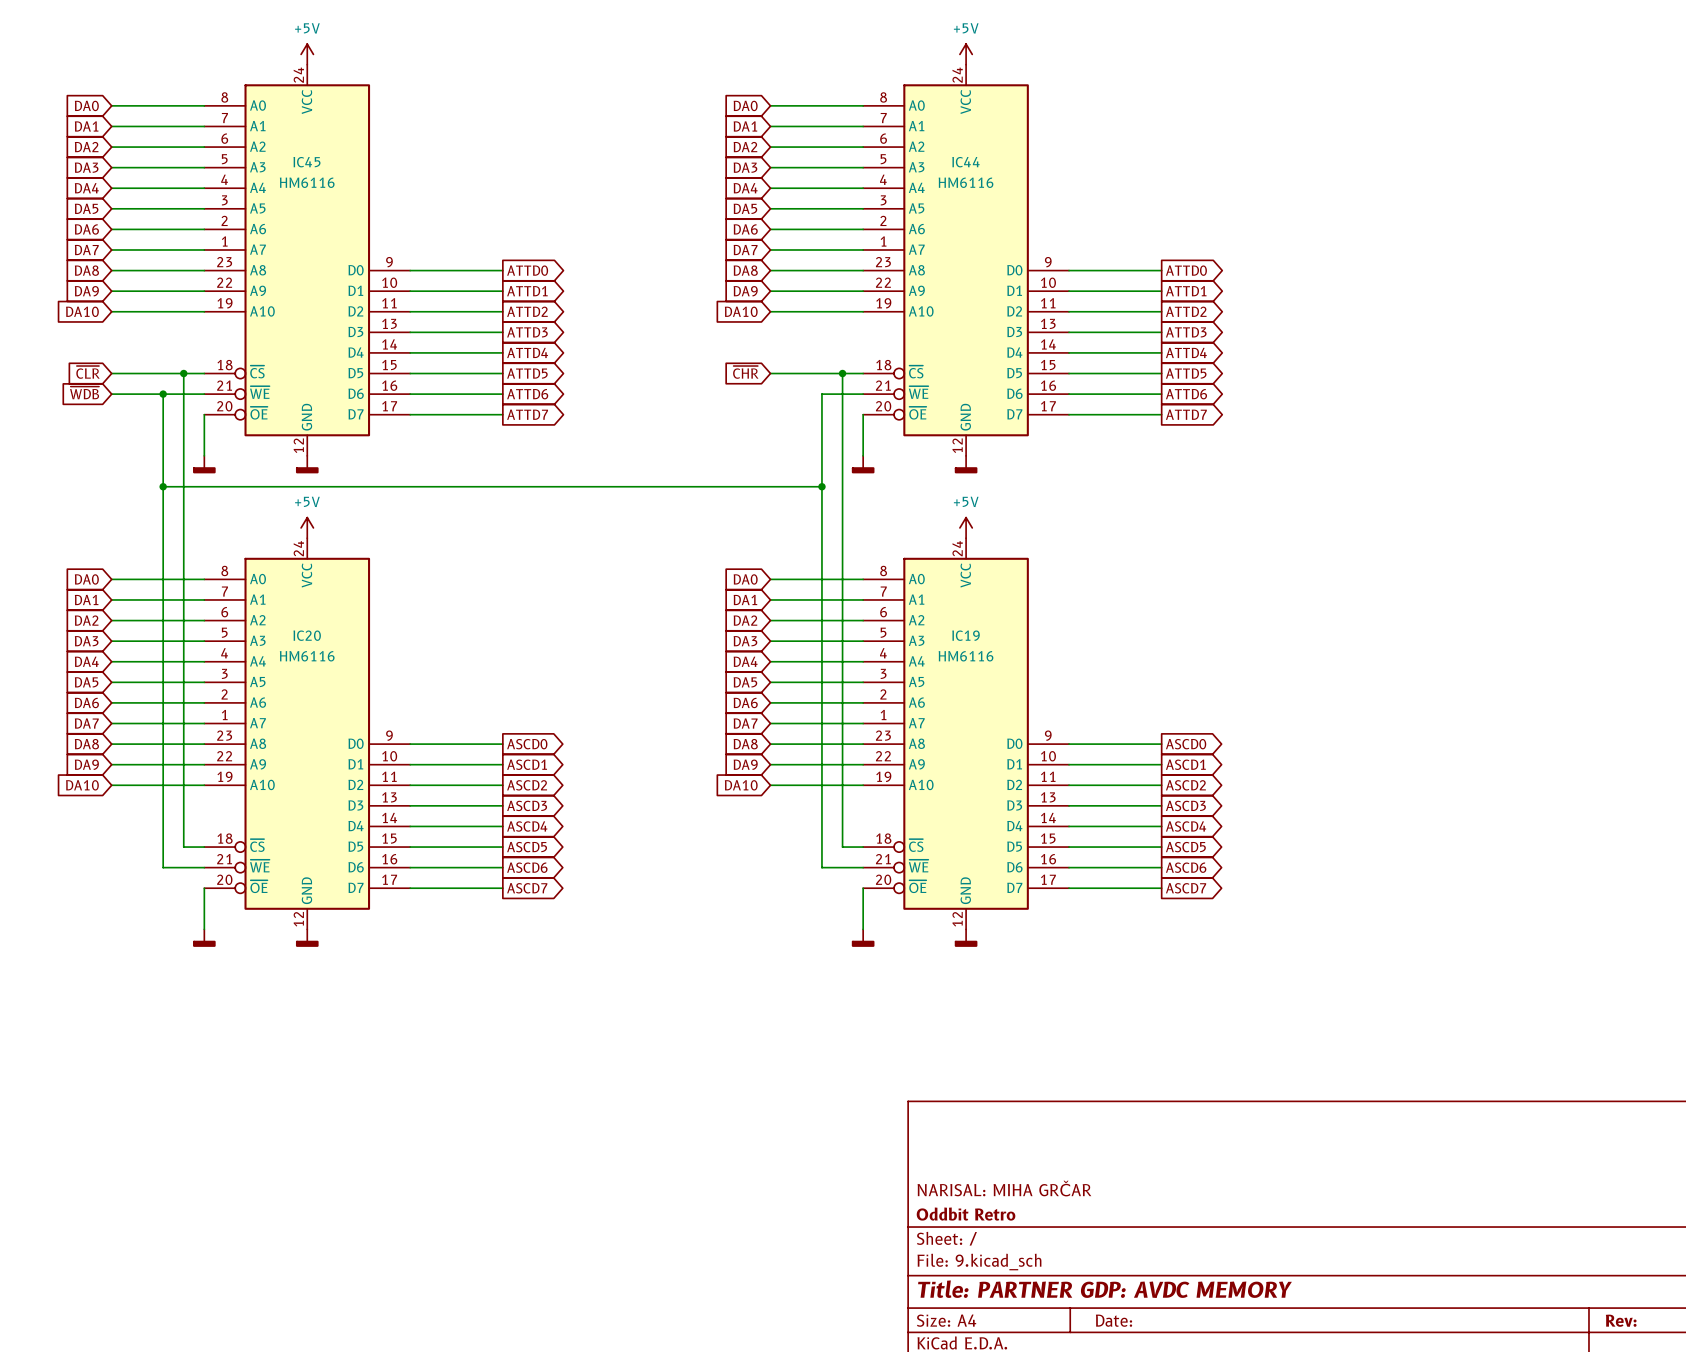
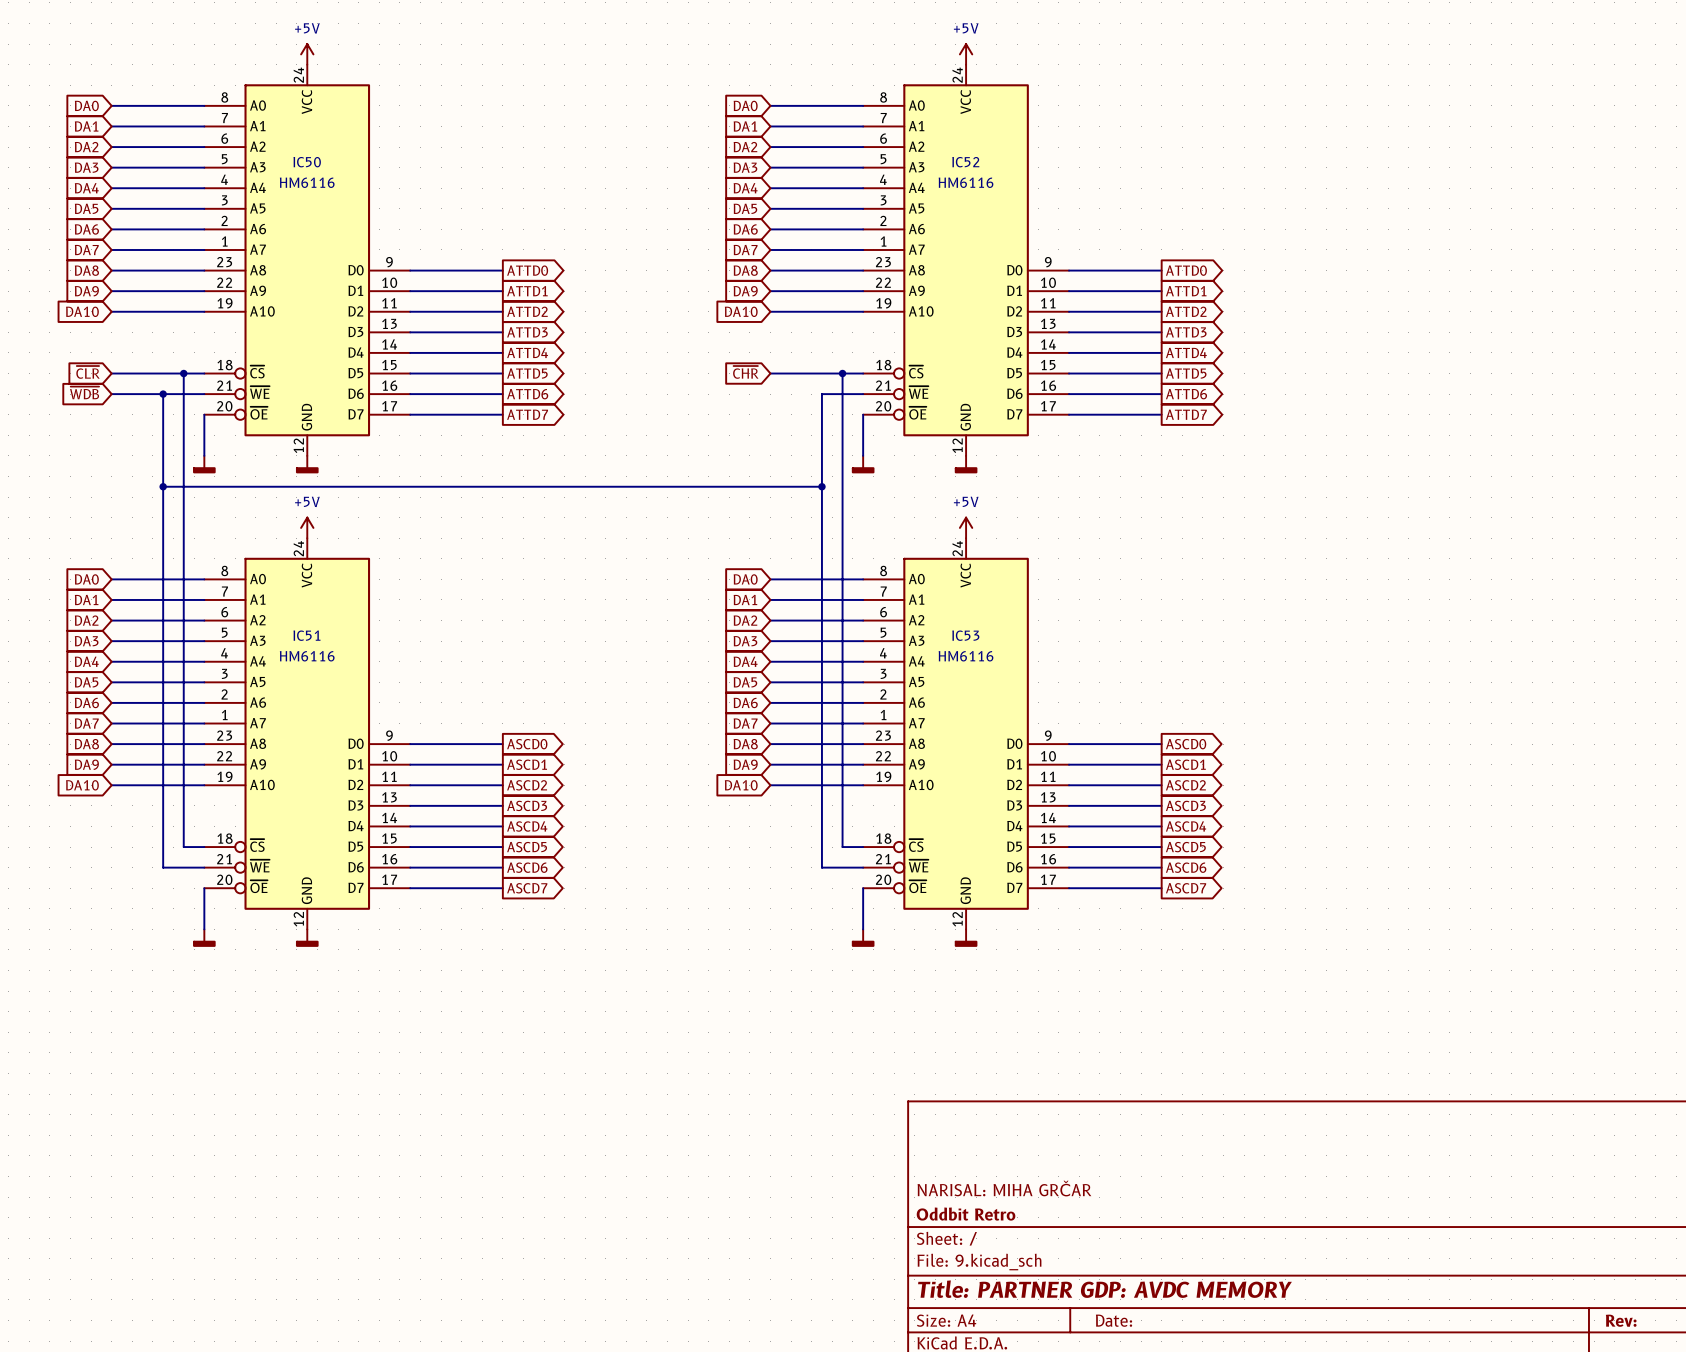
IC45 name: IC45 (306, 162) -> IC50 (307, 162)
IC44 name: IC44 (965, 162) -> IC52 (965, 162)
IC20 name: IC20 (307, 635) -> IC51 (306, 635)
IC19 name: IC19 (966, 635) -> IC53 (965, 635)

